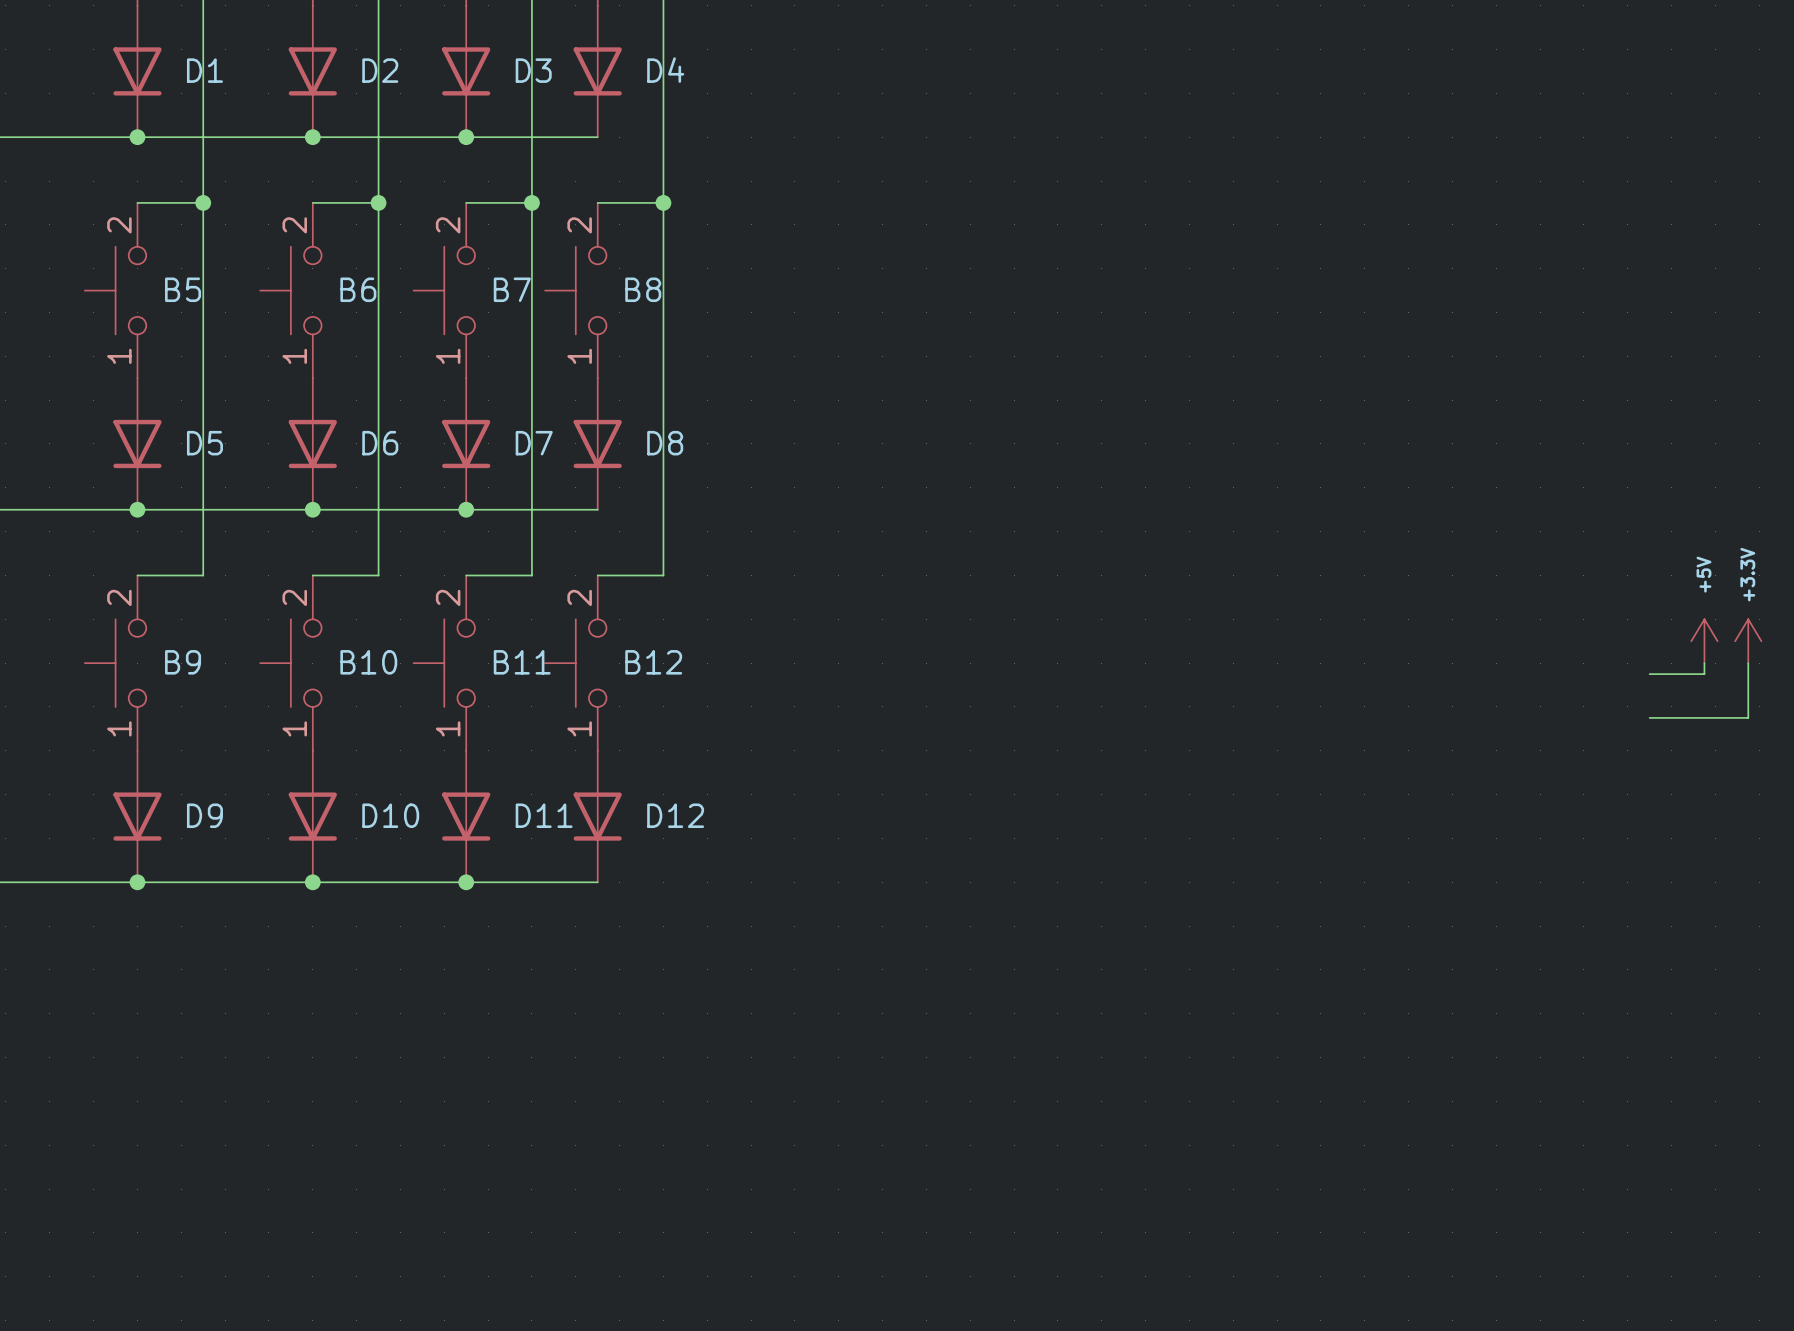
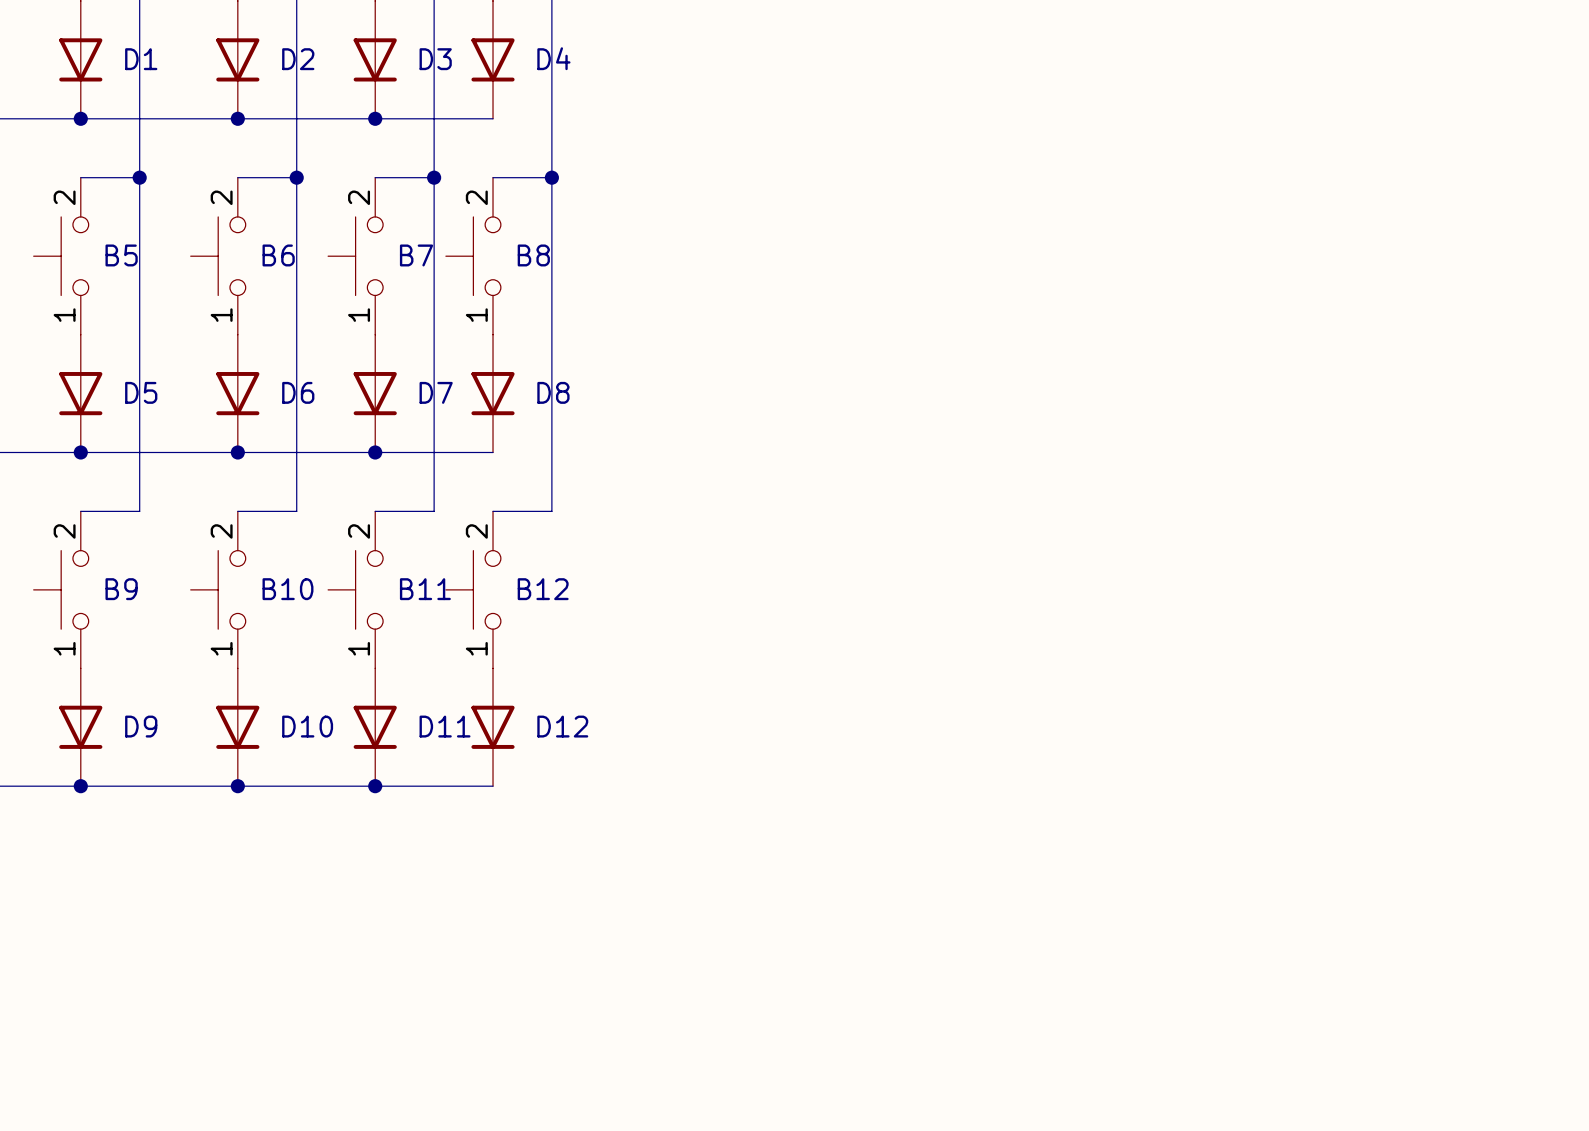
power symbol: +5V (1704, 641) -> none
power symbol: +3.3V (1748, 641) -> none
wire: (1704, 663) (1704, 674) (1649, 674) -> none
wire: (1748, 663) (1748, 717) (1649, 717) -> none

